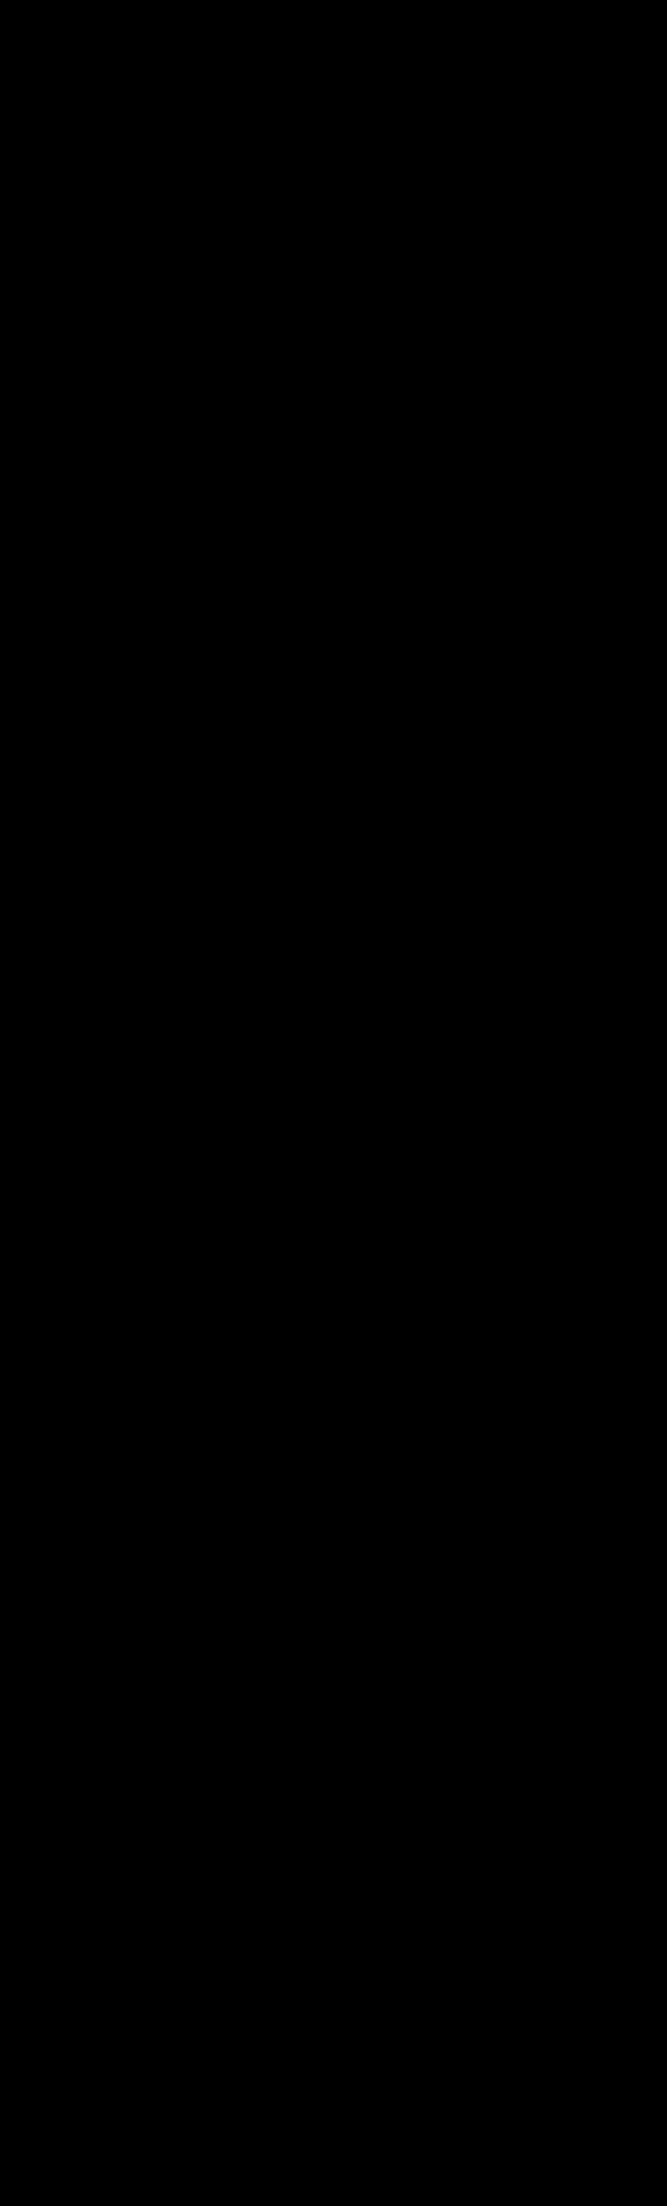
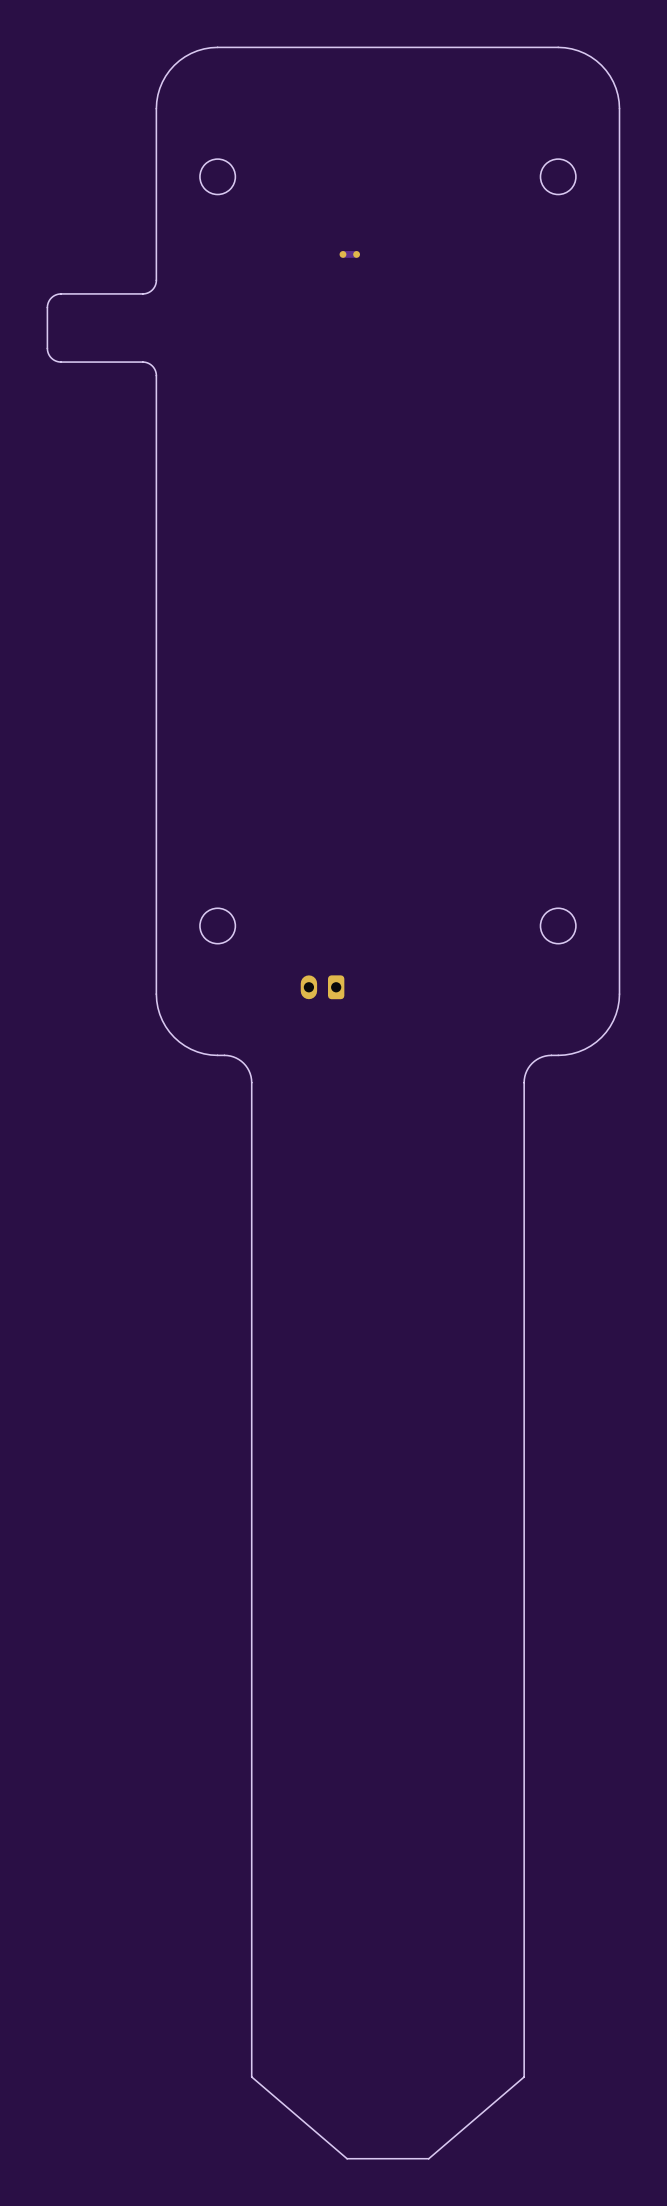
board edge: none -> (558, 47) (217, 47) (204, 48) (191, 53) (174, 65) (165, 76) (159, 88) (156, 101) (156, 280) (154, 287) (144, 293) (57, 294) (51, 297) (47, 306) (47, 349) (53, 359) (61, 362) (144, 362) (152, 366) (156, 374) (156, 1000) (159, 1014) (165, 1026) (179, 1042) (197, 1051) (230, 1056) (238, 1059) (247, 1068) (251, 1082) (251, 2076) (347, 2158) (428, 2158) (524, 2076) (524, 1079) (530, 1065) (539, 1058) (578, 1051) (590, 1045) (601, 1037) (610, 1026) (616, 1014) (619, 994) (619, 101) (613, 82) (606, 70) (596, 60) (578, 50) (558, 47)
round board edge: none -> [199, 158, 237, 196]
round board edge: none -> [539, 158, 577, 196]
part: none -> (349, 254)
round board edge: none -> [199, 907, 237, 945]
round board edge: none -> [539, 907, 577, 945]
part: none -> (322, 987)

